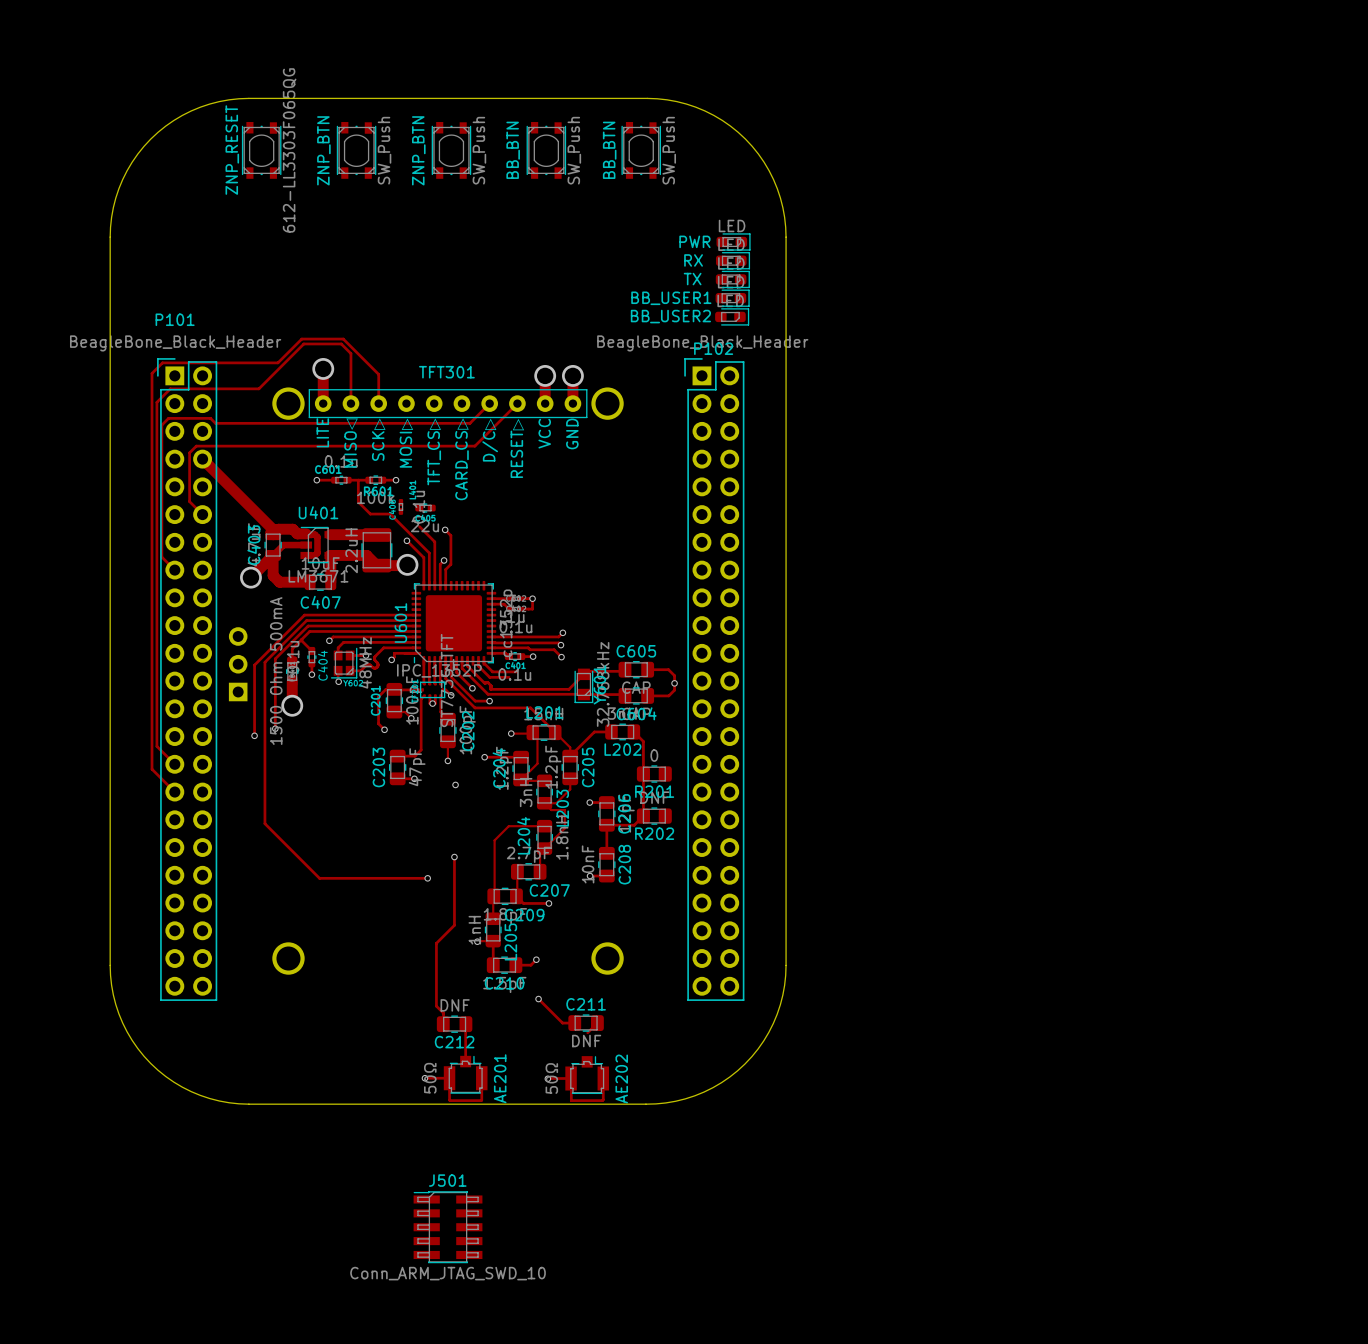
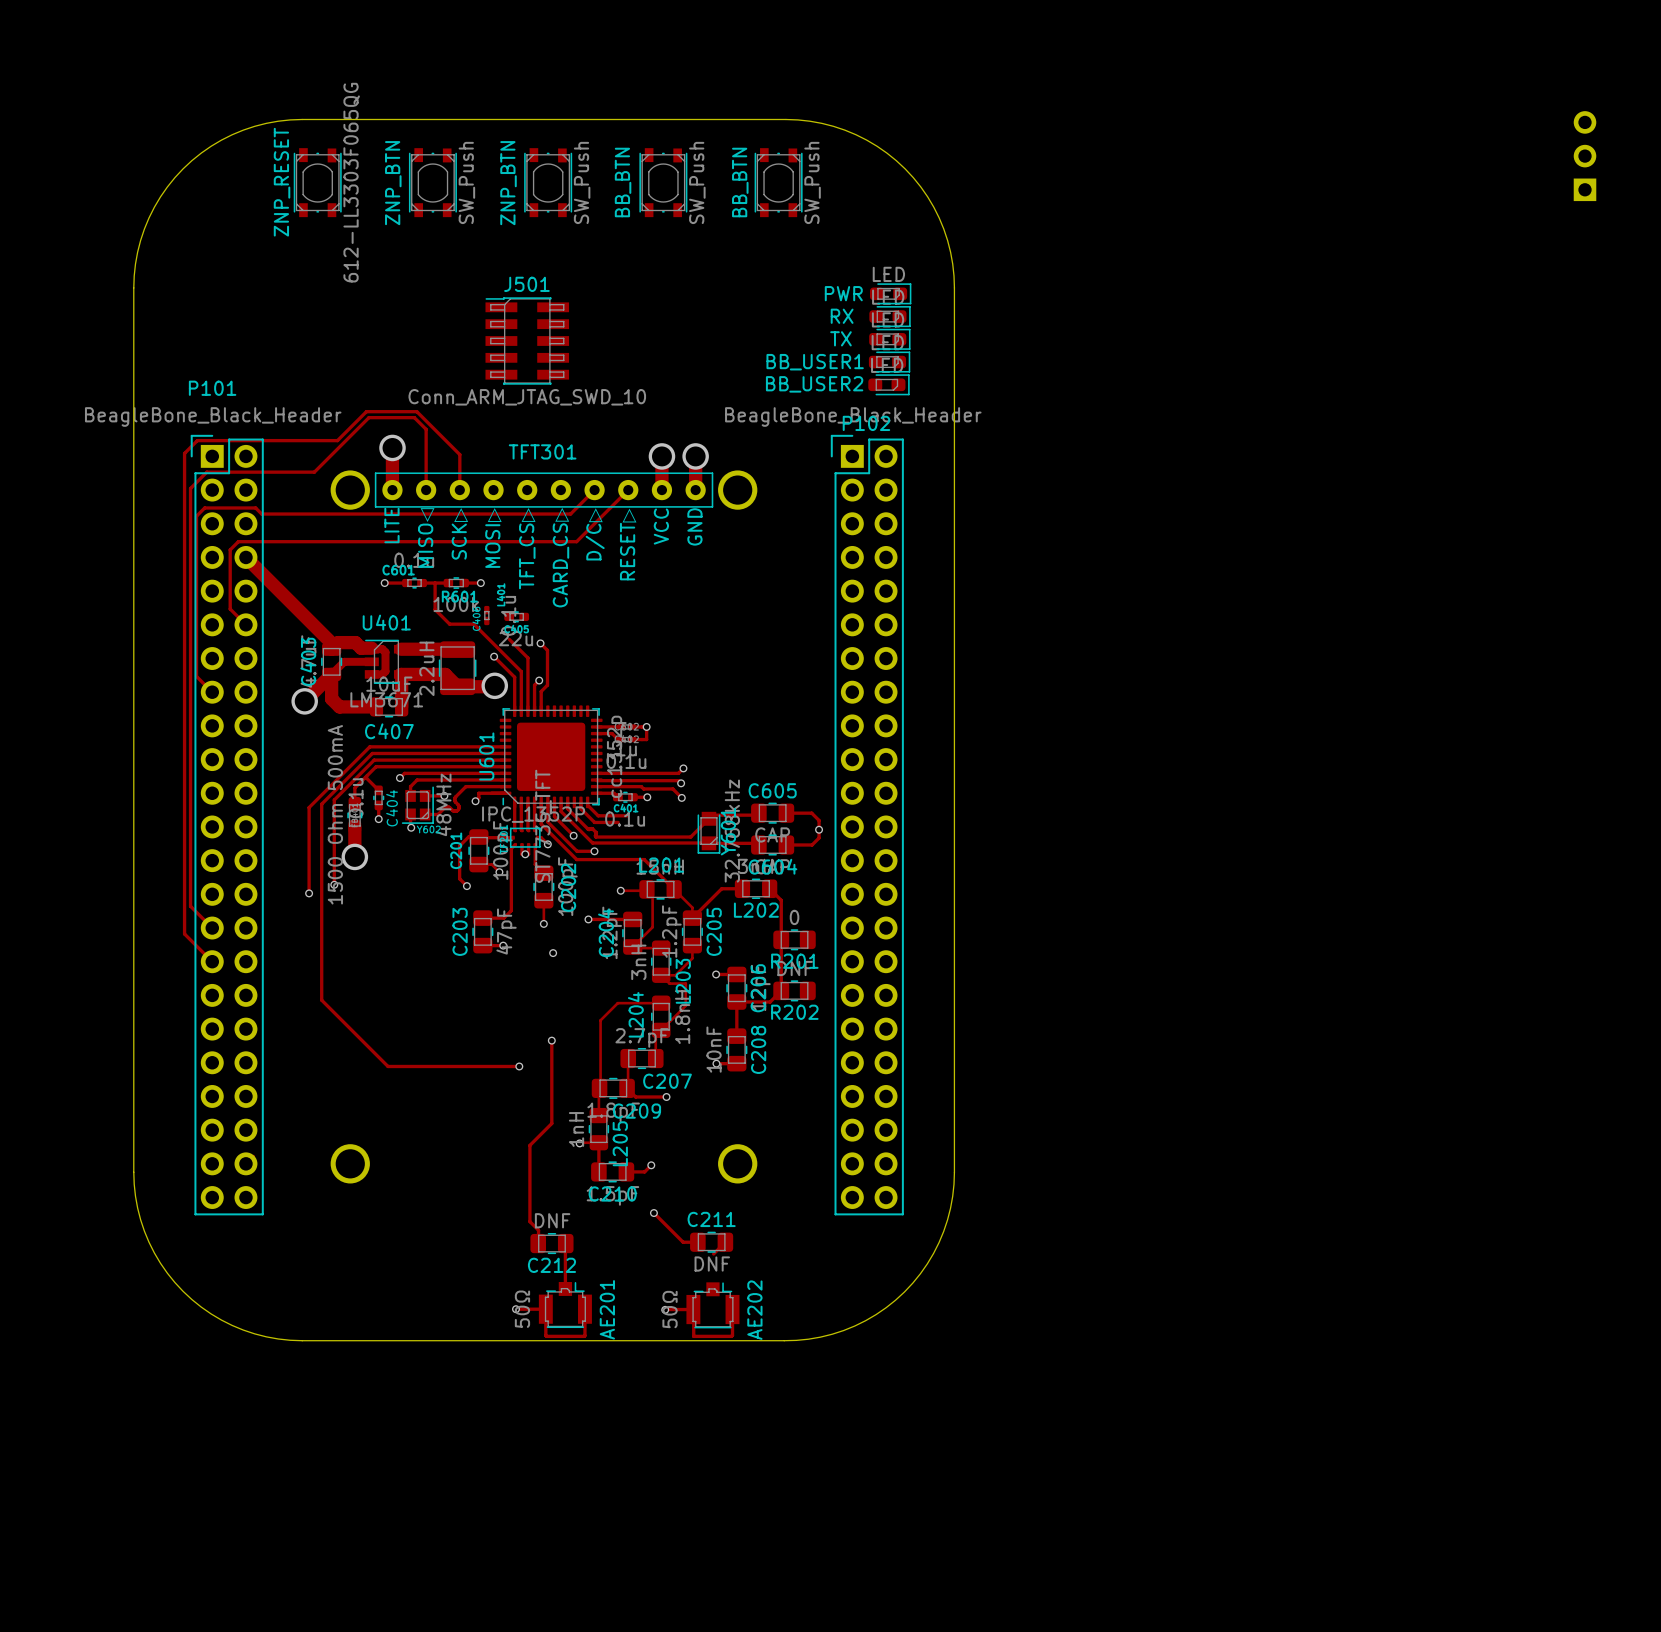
part: none -> (1585, 156)
part: (238, 664) -> none
J501 position: (448, 1227) -> (527, 340)

